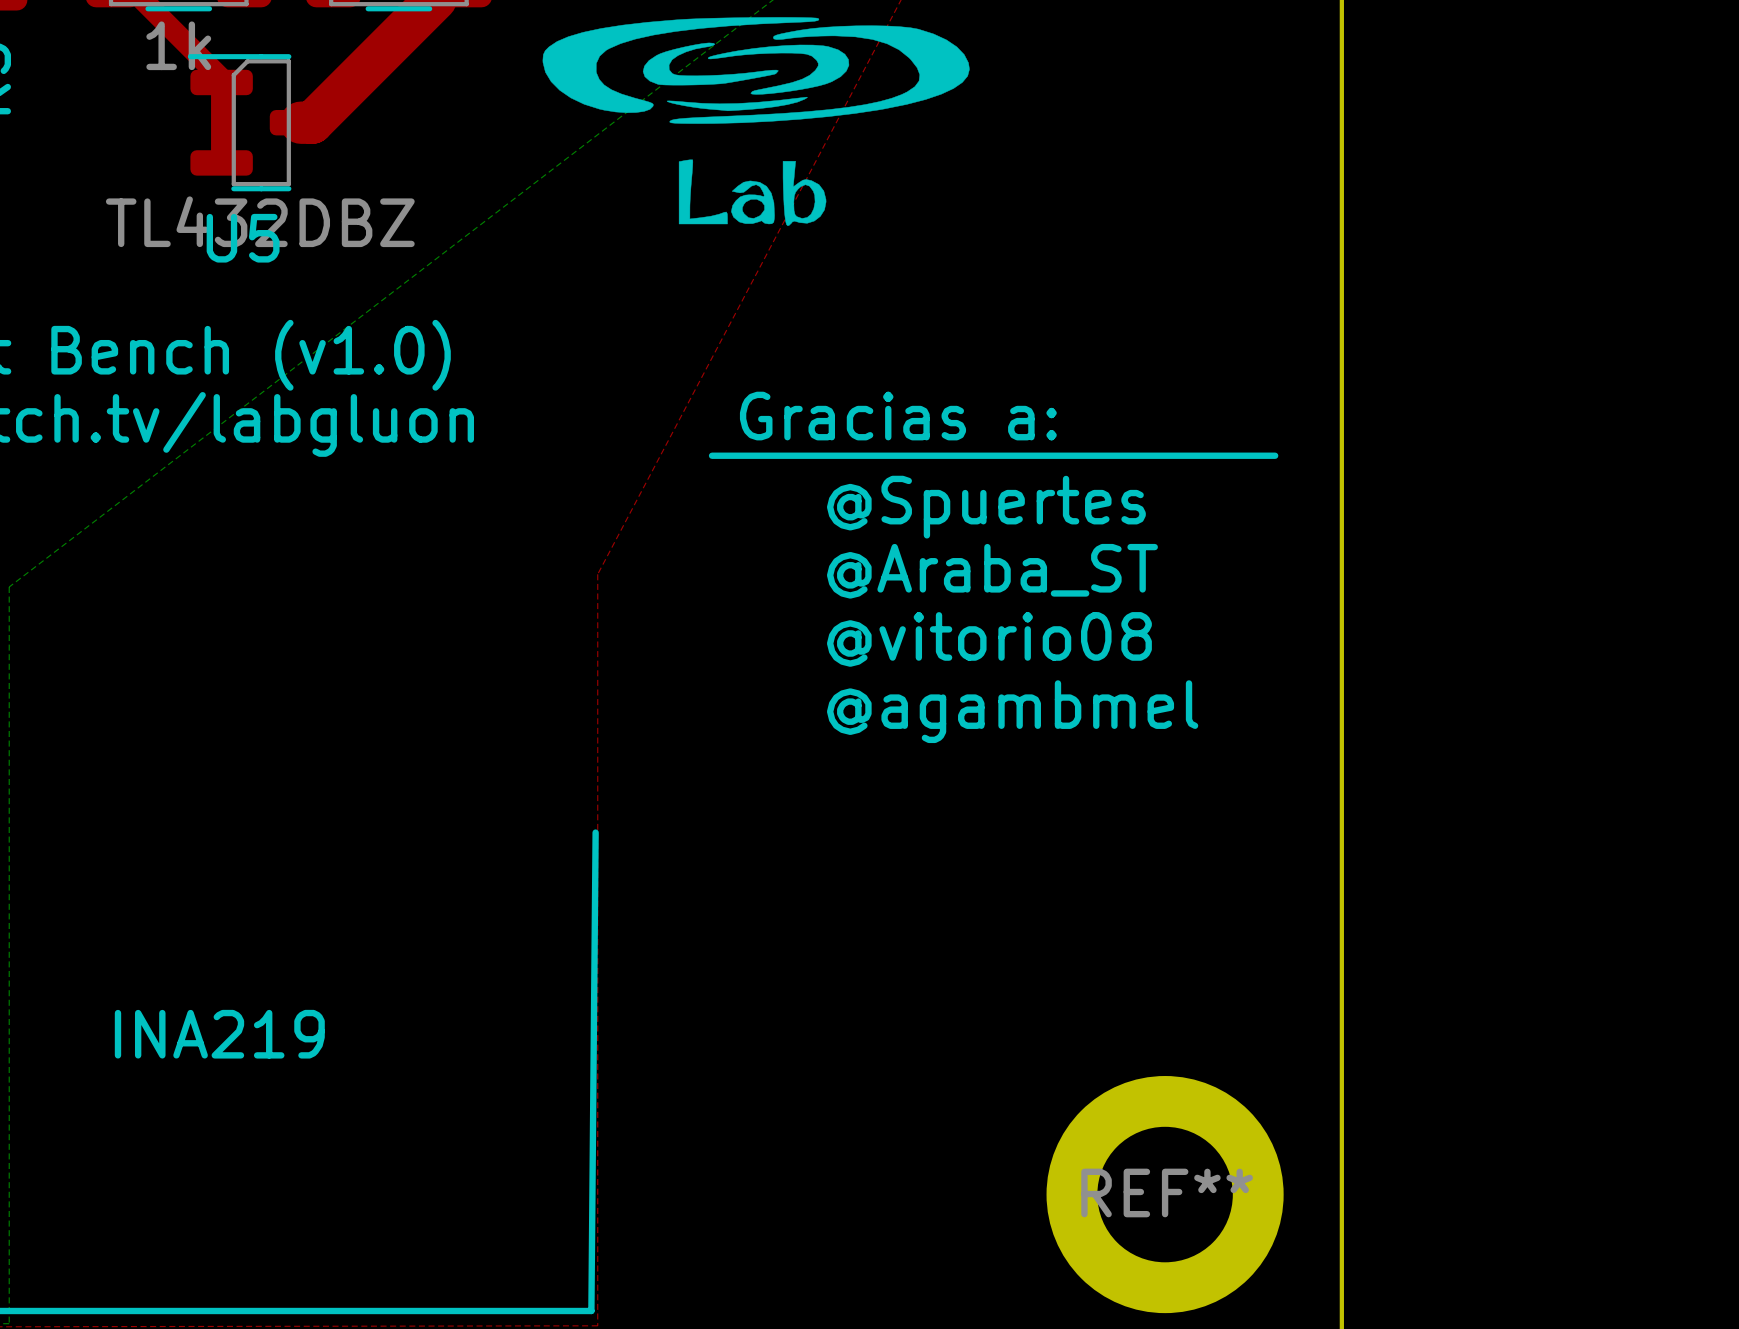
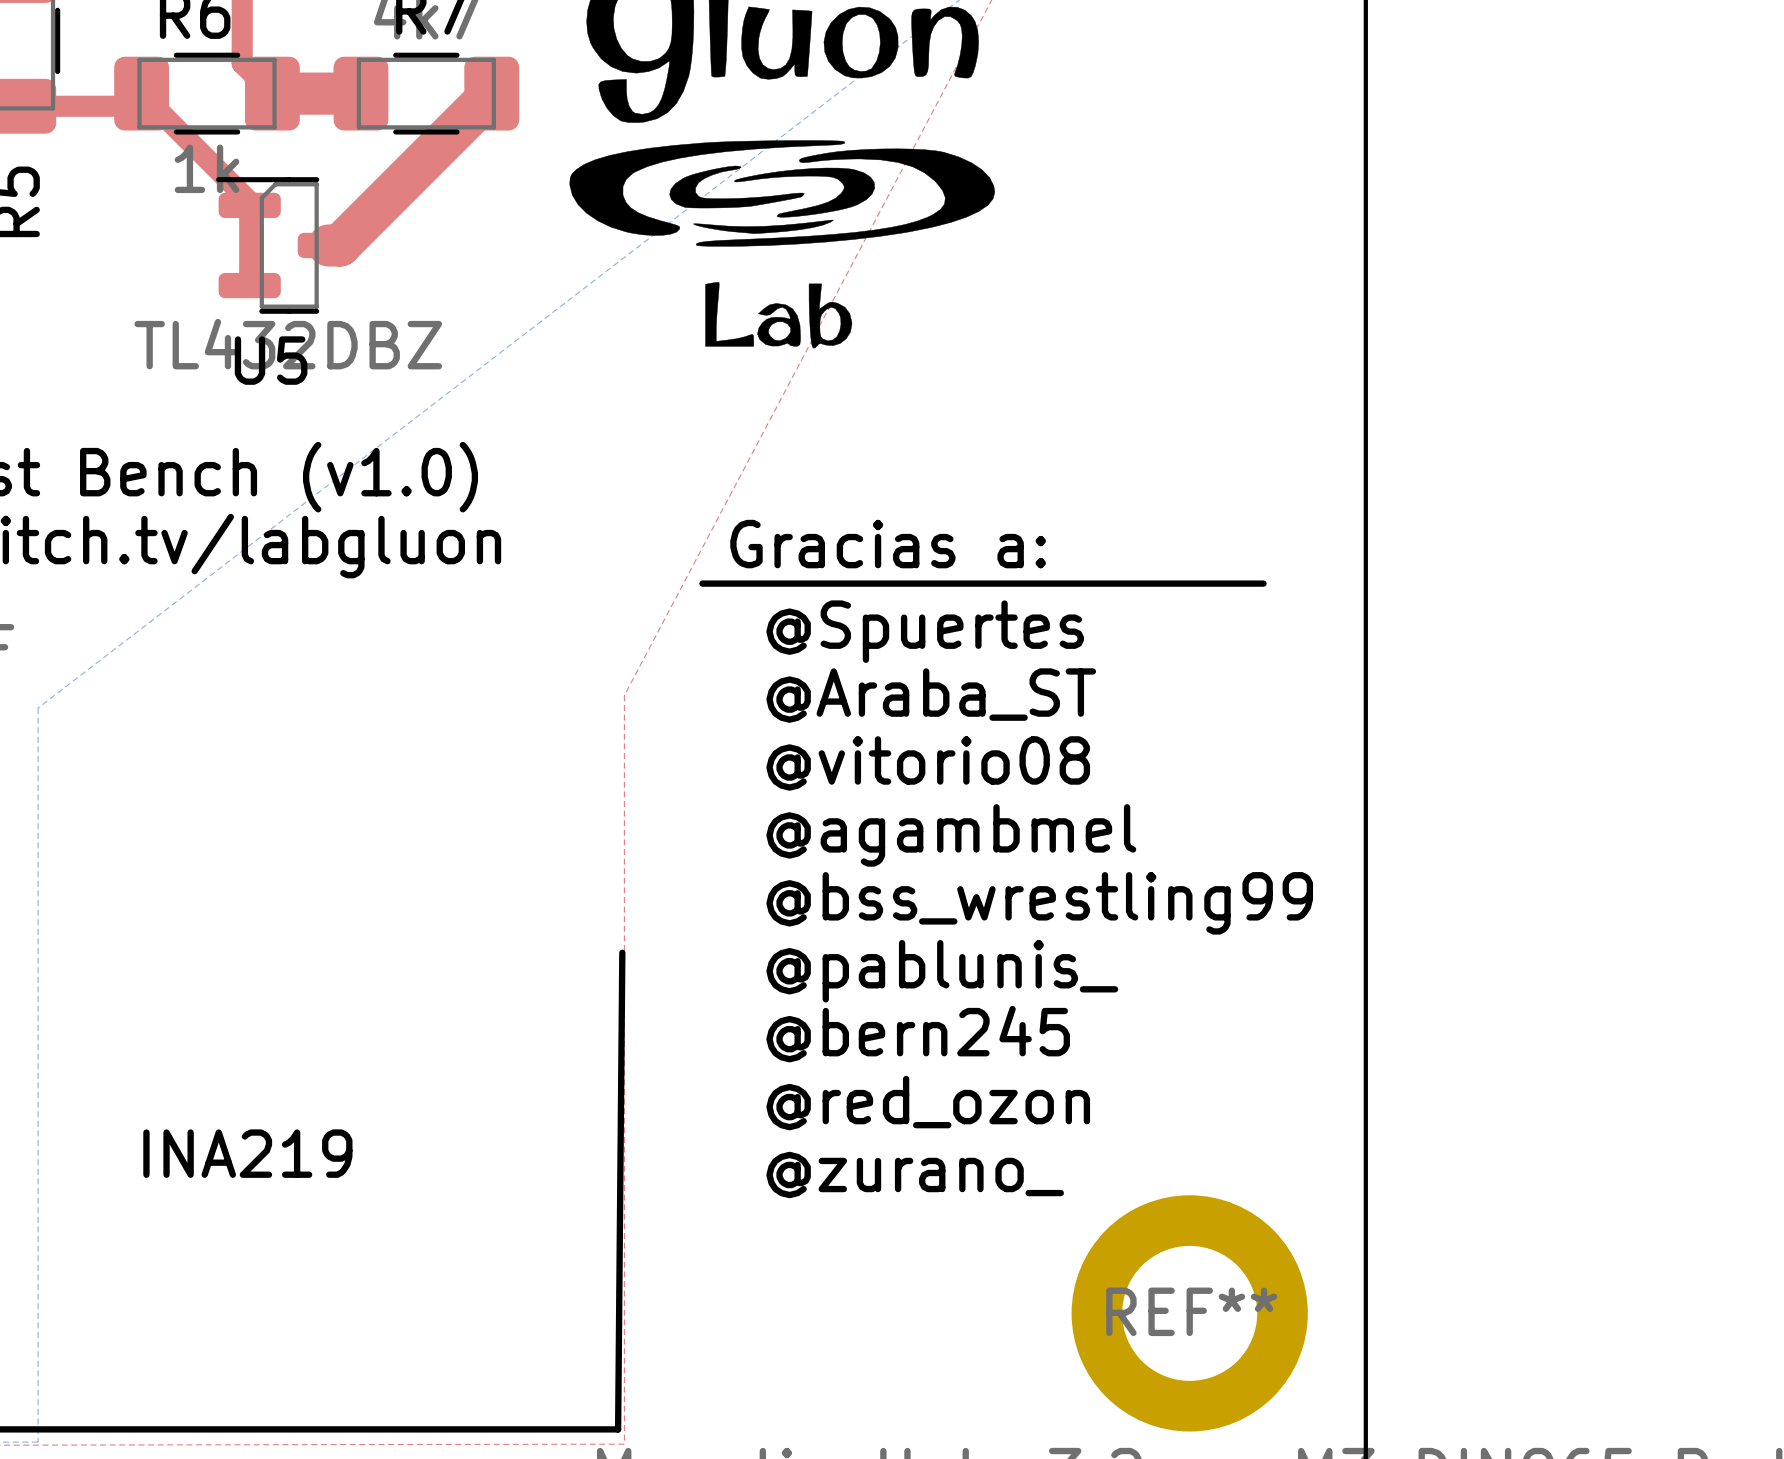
text position: Gracias a: (898, 416) -> Gracias a: (888, 544)
line: (712, 455) (1275, 455) -> (702, 583) (1263, 583)
text position: @Spuertes (986, 507) -> @Spuertes (925, 631)
text position: @Araba_ST (992, 571) -> @Araba_ST (931, 695)
text position: @vitorio08 (989, 639) -> @vitorio08 (928, 763)
text position: @agambmel (1012, 711) -> @agambmel (951, 835)
text: none -> @bss_wrestling99 (1039, 903)
text: none -> @pablunis_ (942, 971)
text: none -> @bern245 (918, 1034)
text: none -> @red_ozon (928, 1103)
text: none -> @zurano_ (915, 1175)

